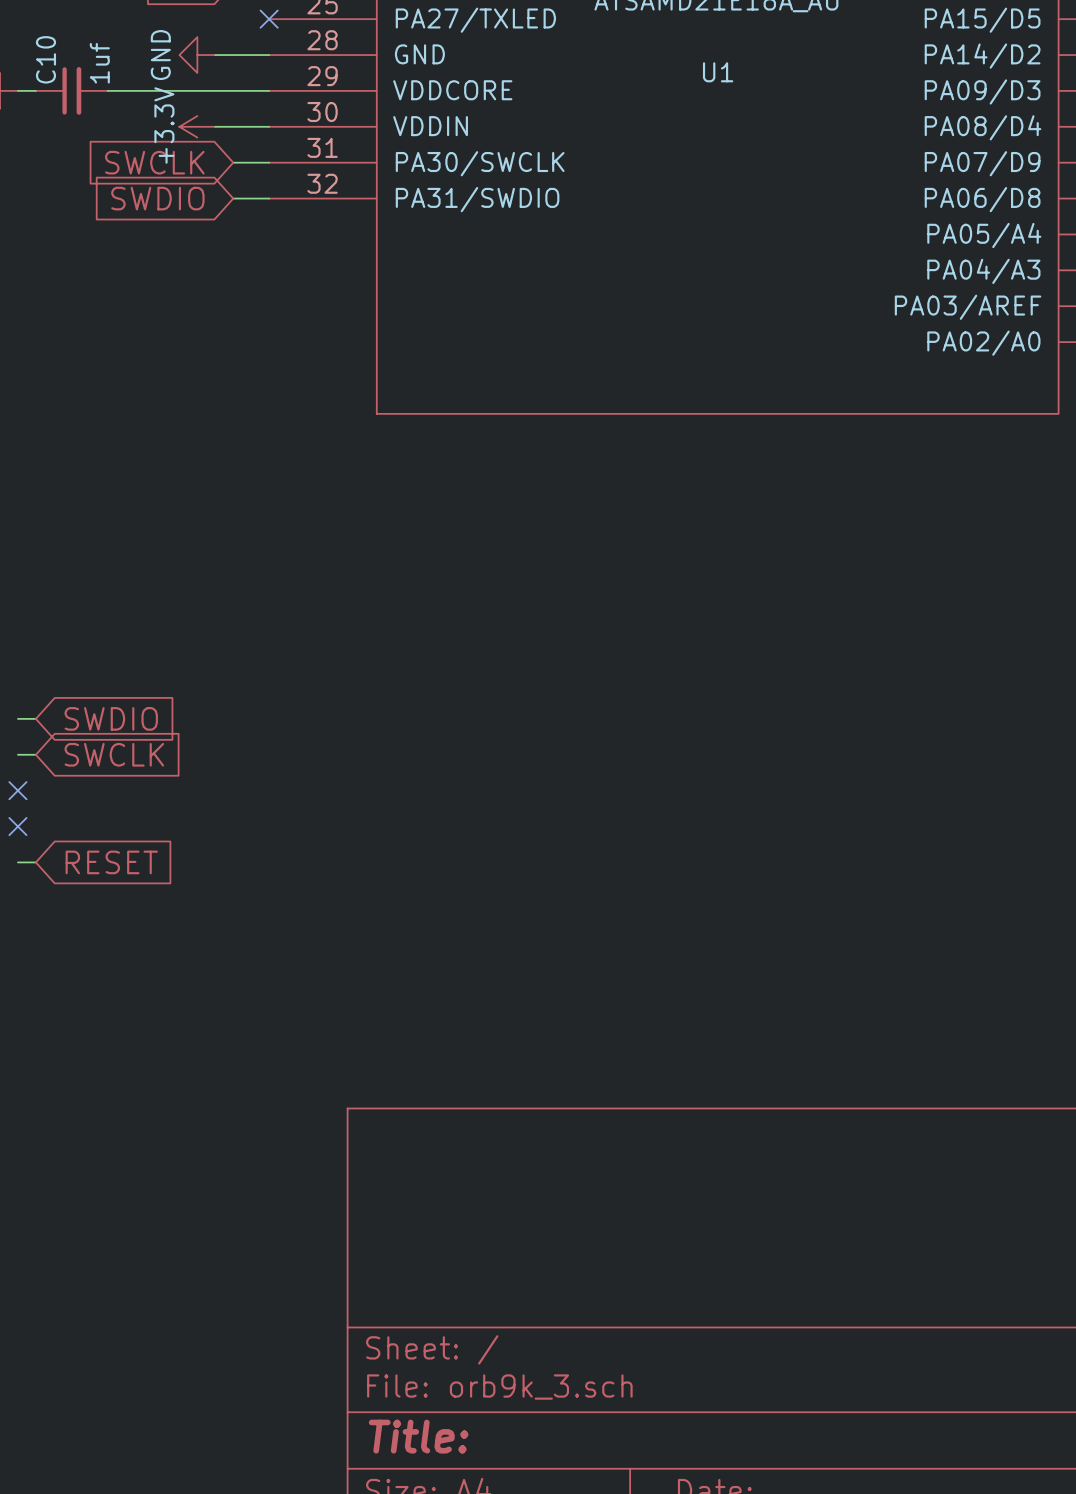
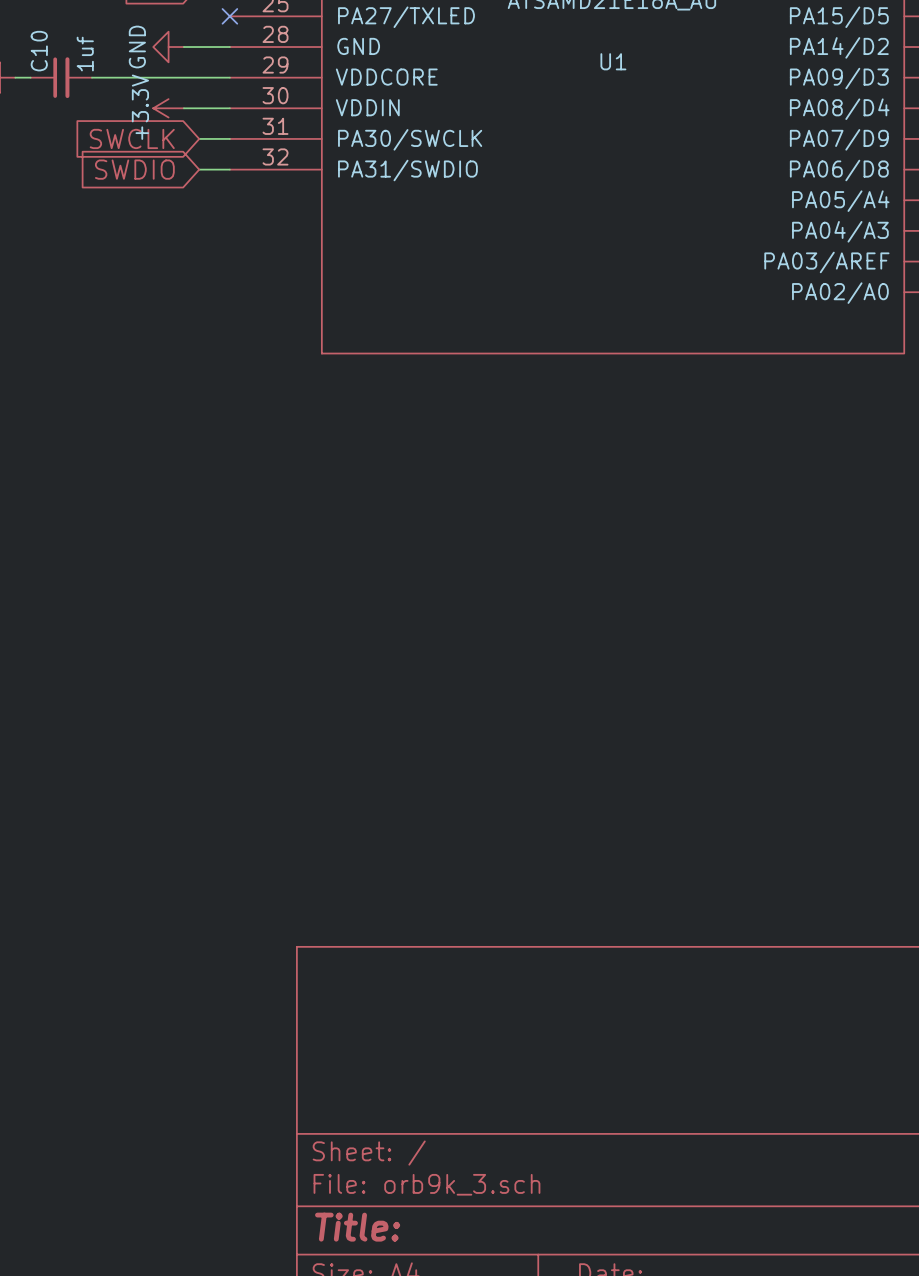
wire: (17, 718) (35, 718) -> none
global label: SWDIO (111, 718) -> none
wire: (17, 754) (35, 754) -> none
global label: SWCLK (114, 754) -> none
no-connect mark: (17, 790) -> none
no-connect mark: (17, 826) -> none
wire: (17, 862) (35, 862) -> none
global label: RESET (111, 862) -> none

